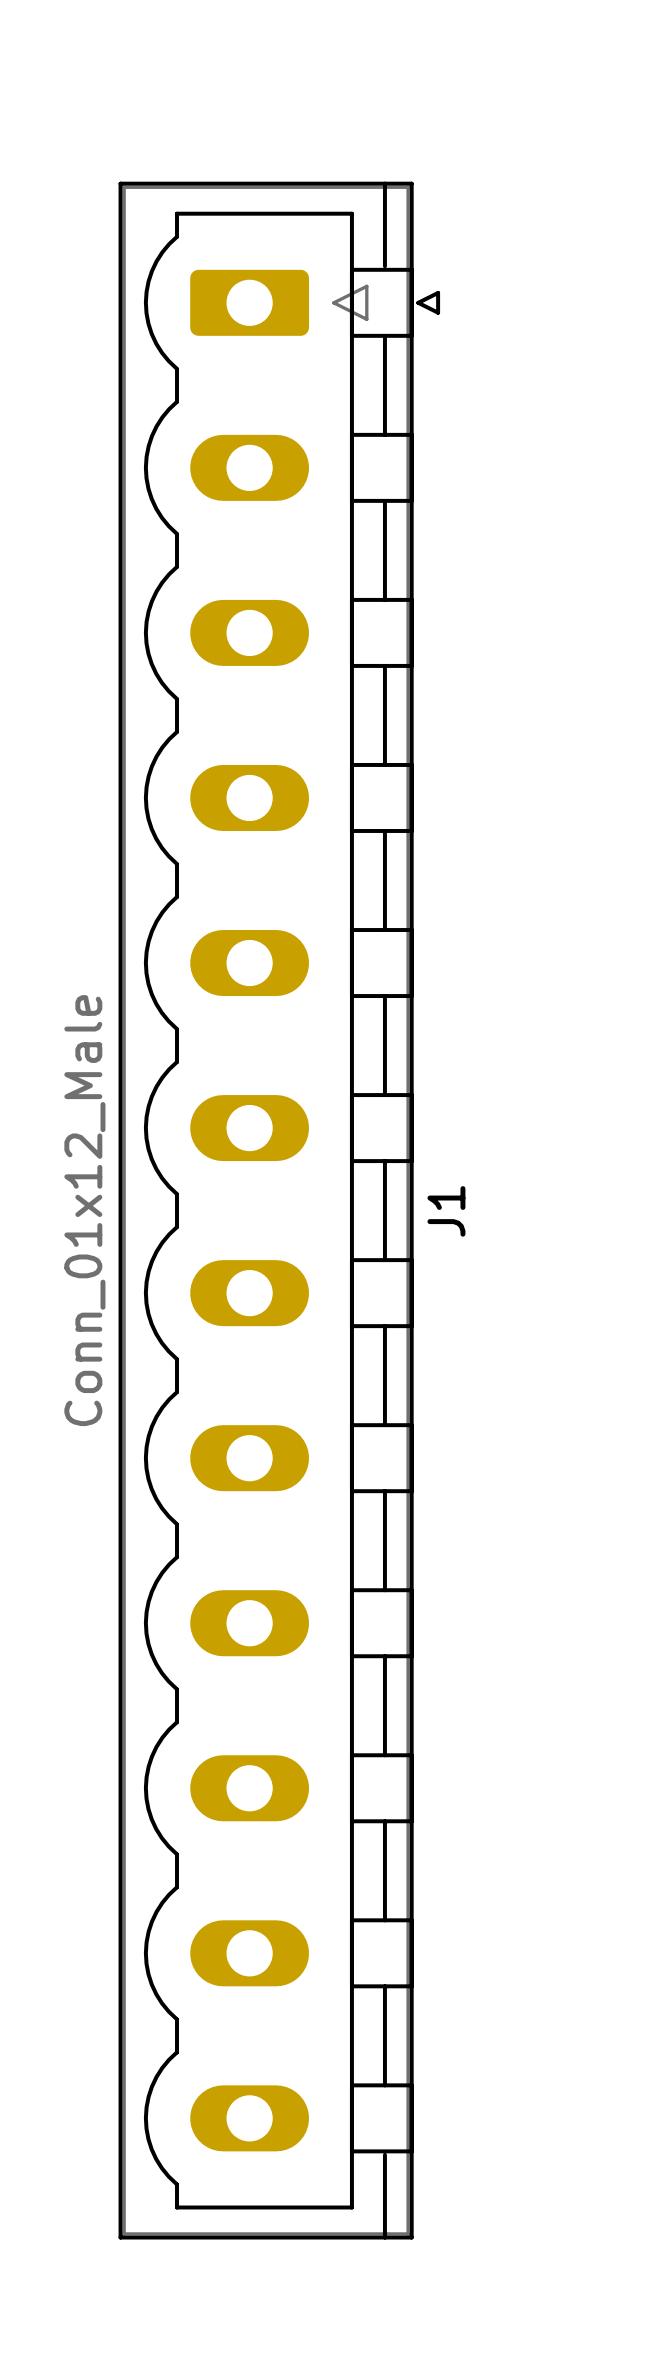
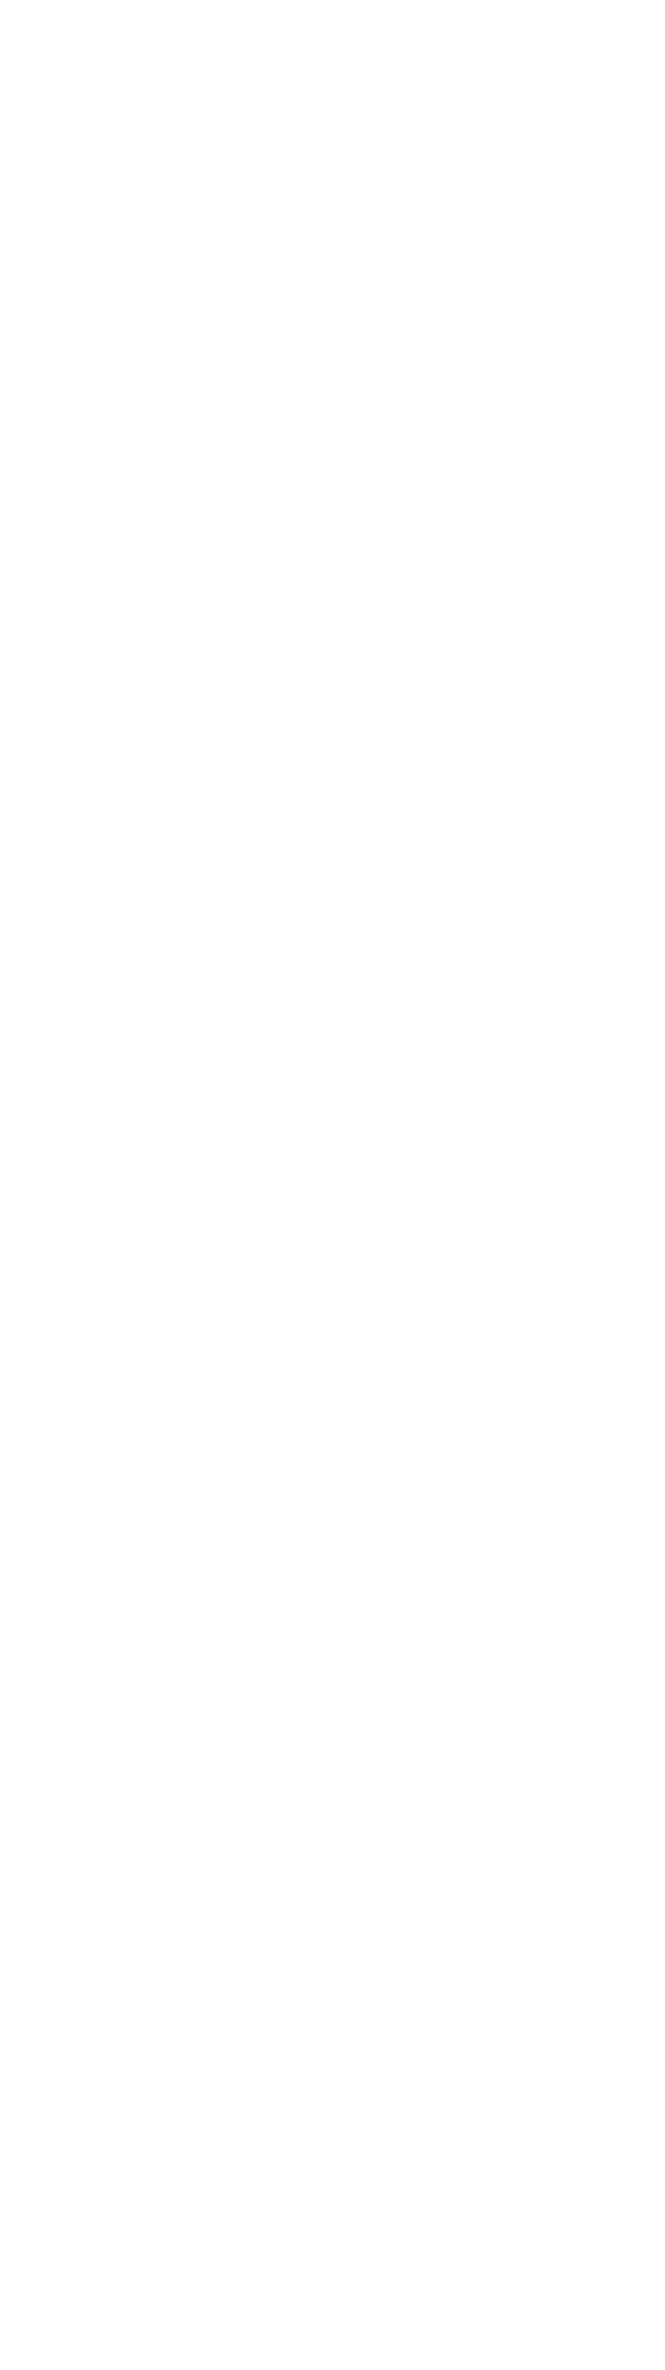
J1: Conn_01x12_Male (279, 1210) -> none

